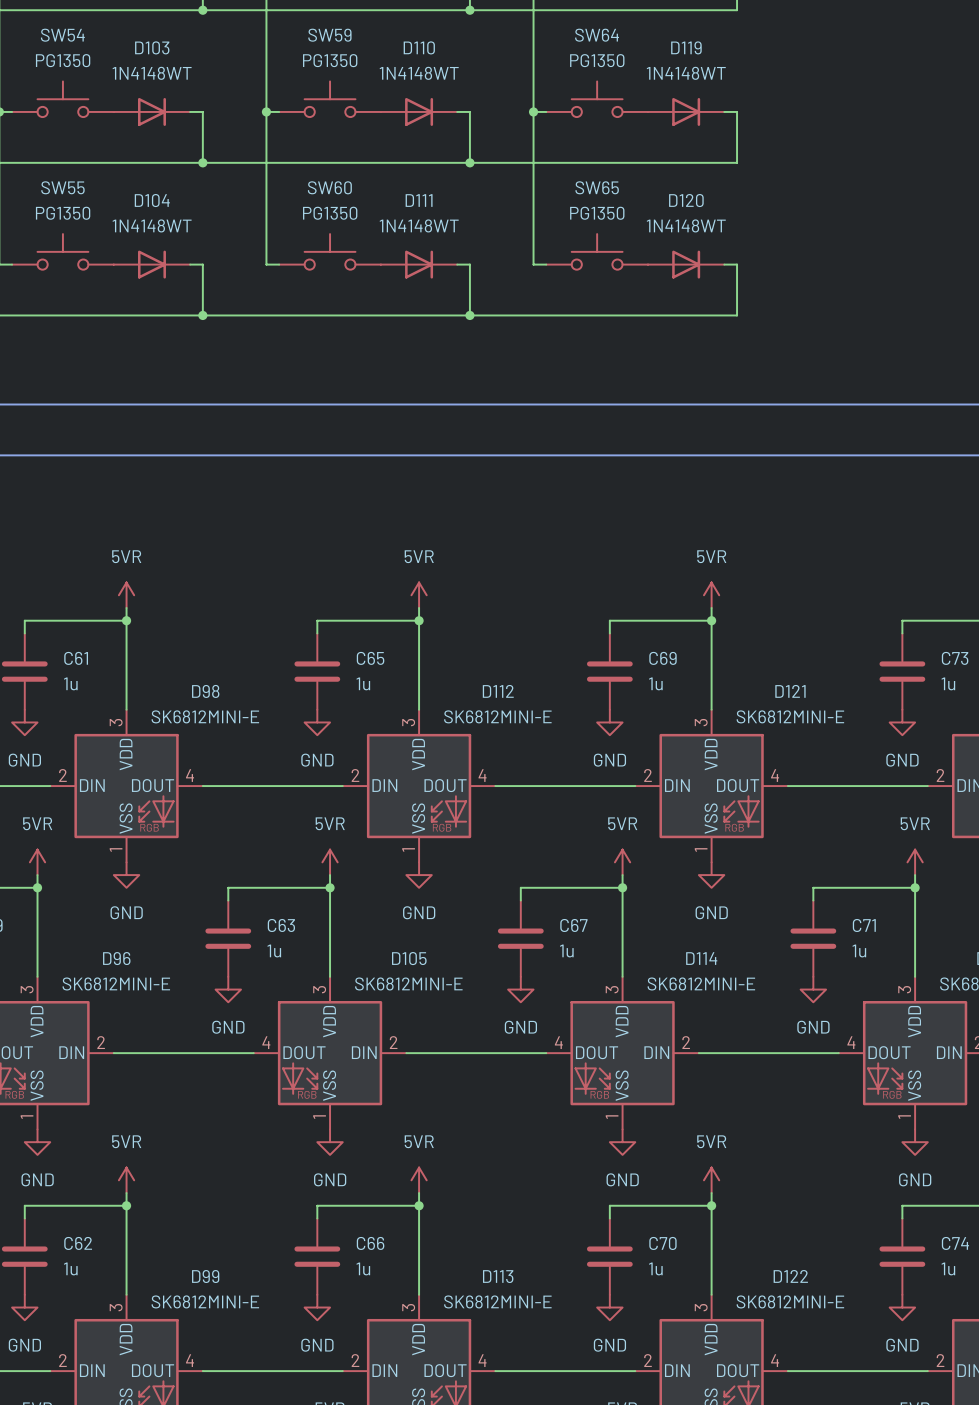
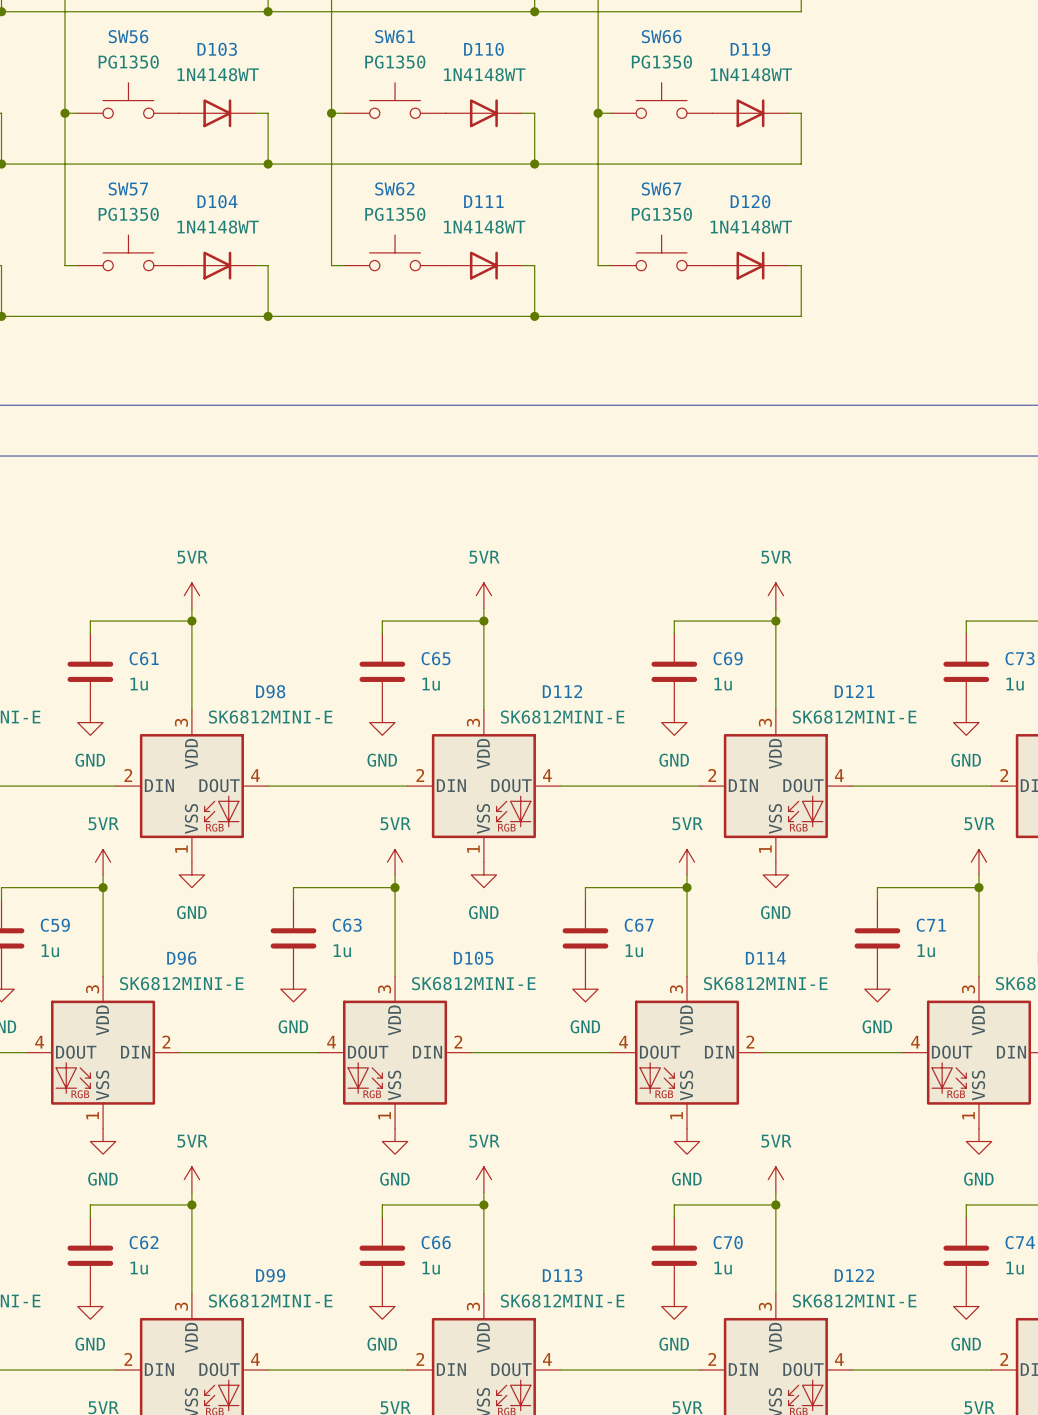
SW54 name: SW54 (62, 35) -> SW56 (128, 36)
SW59 name: SW59 (329, 35) -> SW61 (395, 36)
SW64 name: SW64 (597, 35) -> SW66 (661, 36)
SW55 name: SW55 (62, 187) -> SW57 (128, 188)
SW60 name: SW60 (329, 187) -> SW62 (394, 188)
SW65 name: SW65 (597, 187) -> SW67 (661, 188)

